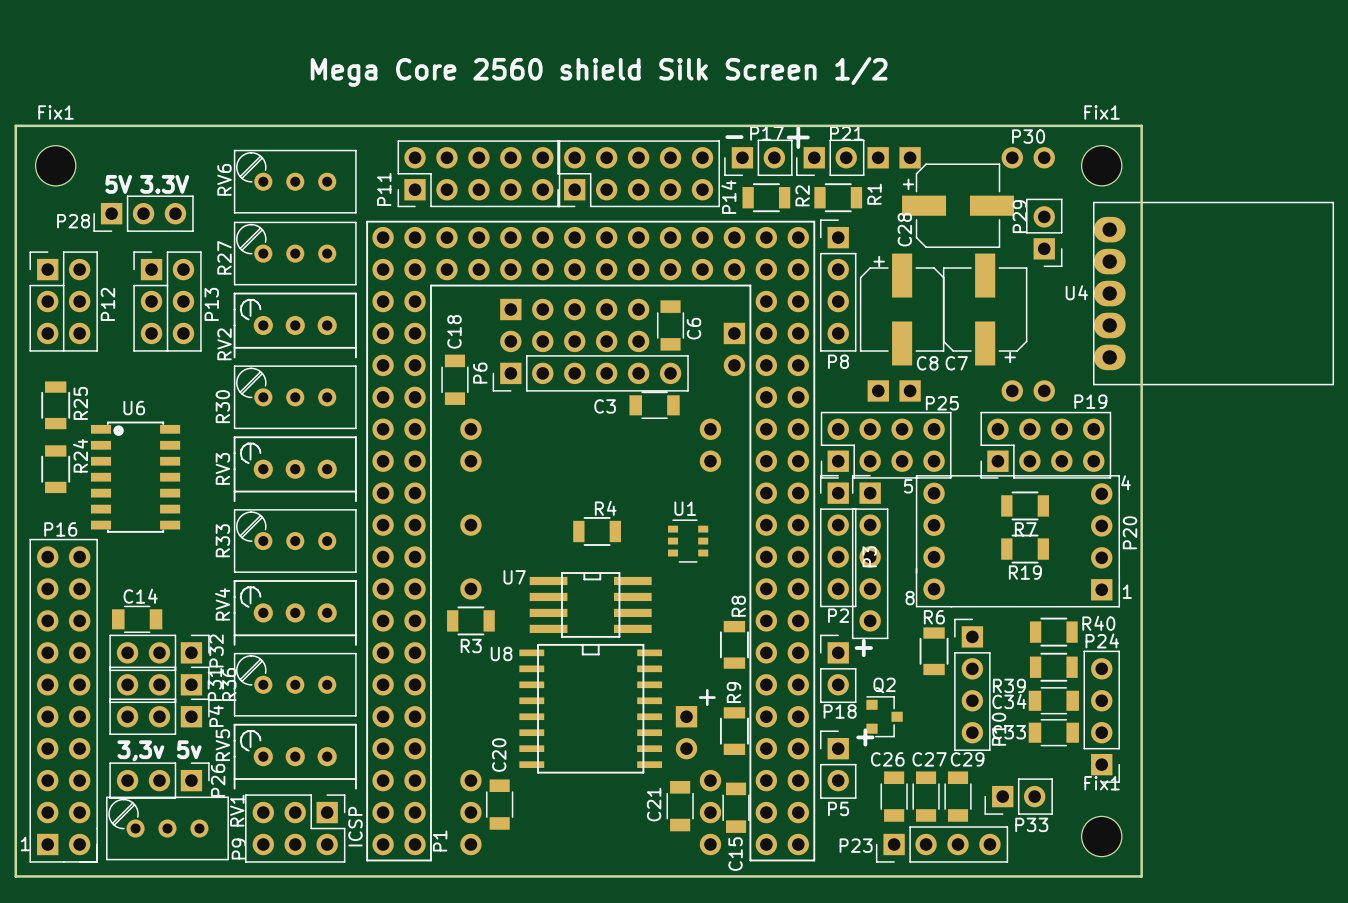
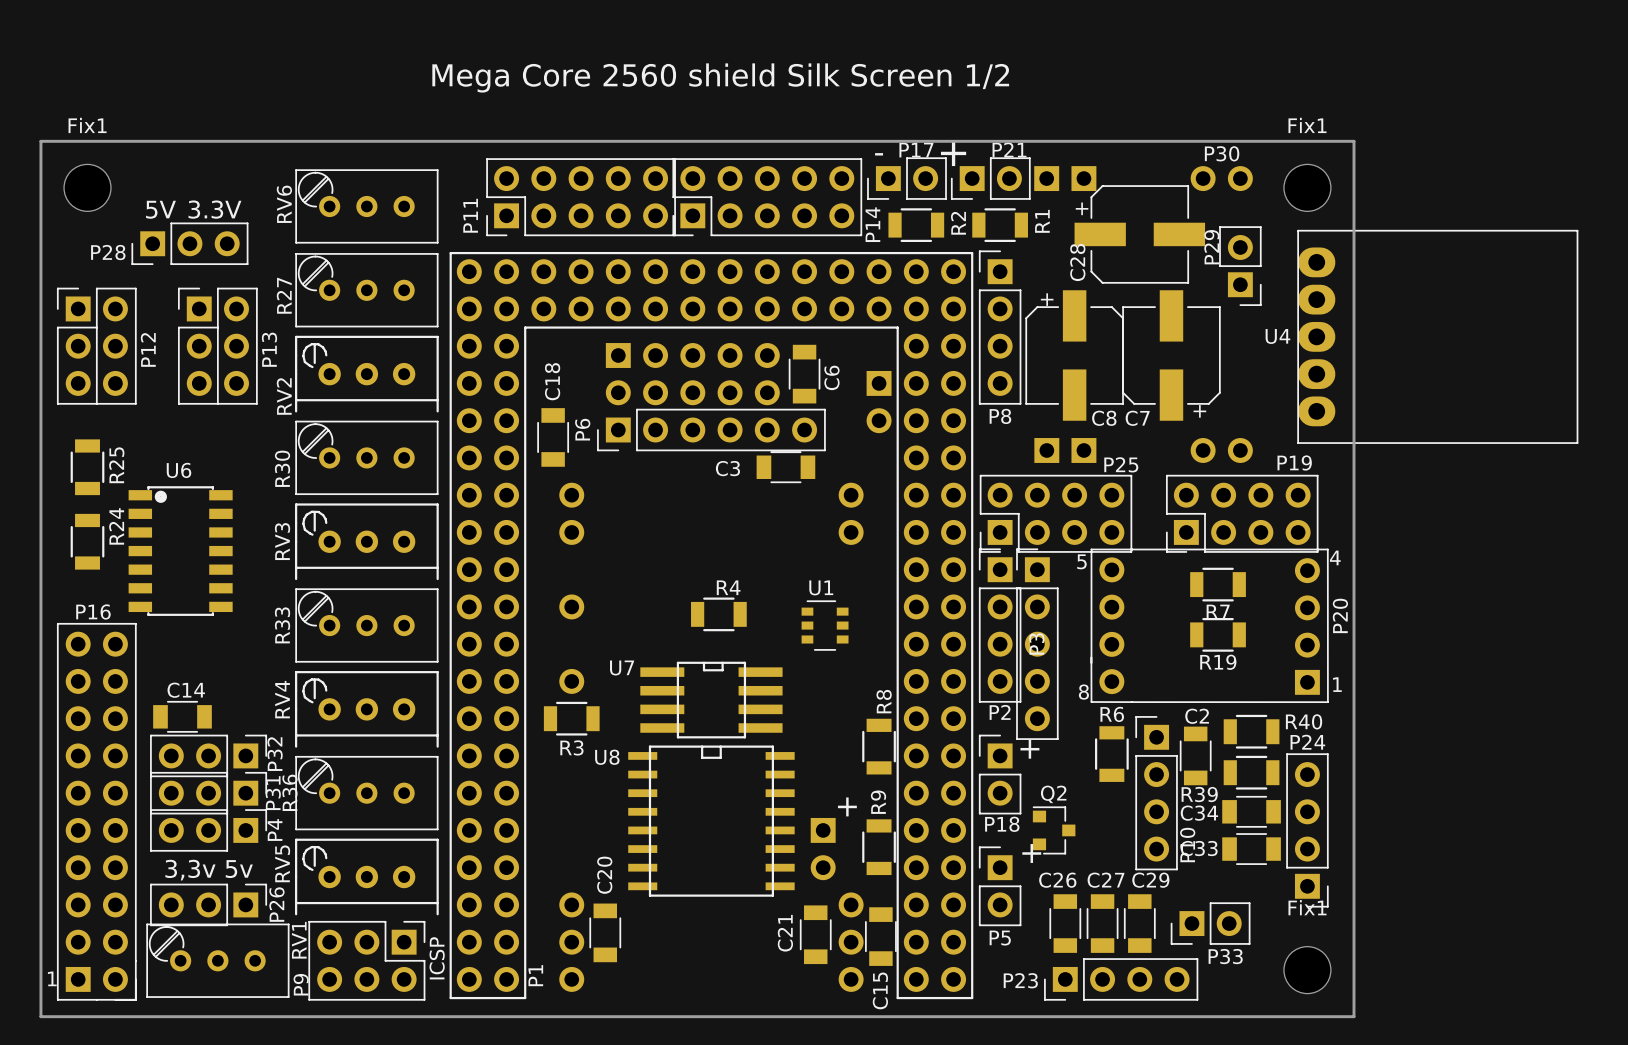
C2: none -> (1195, 755)

